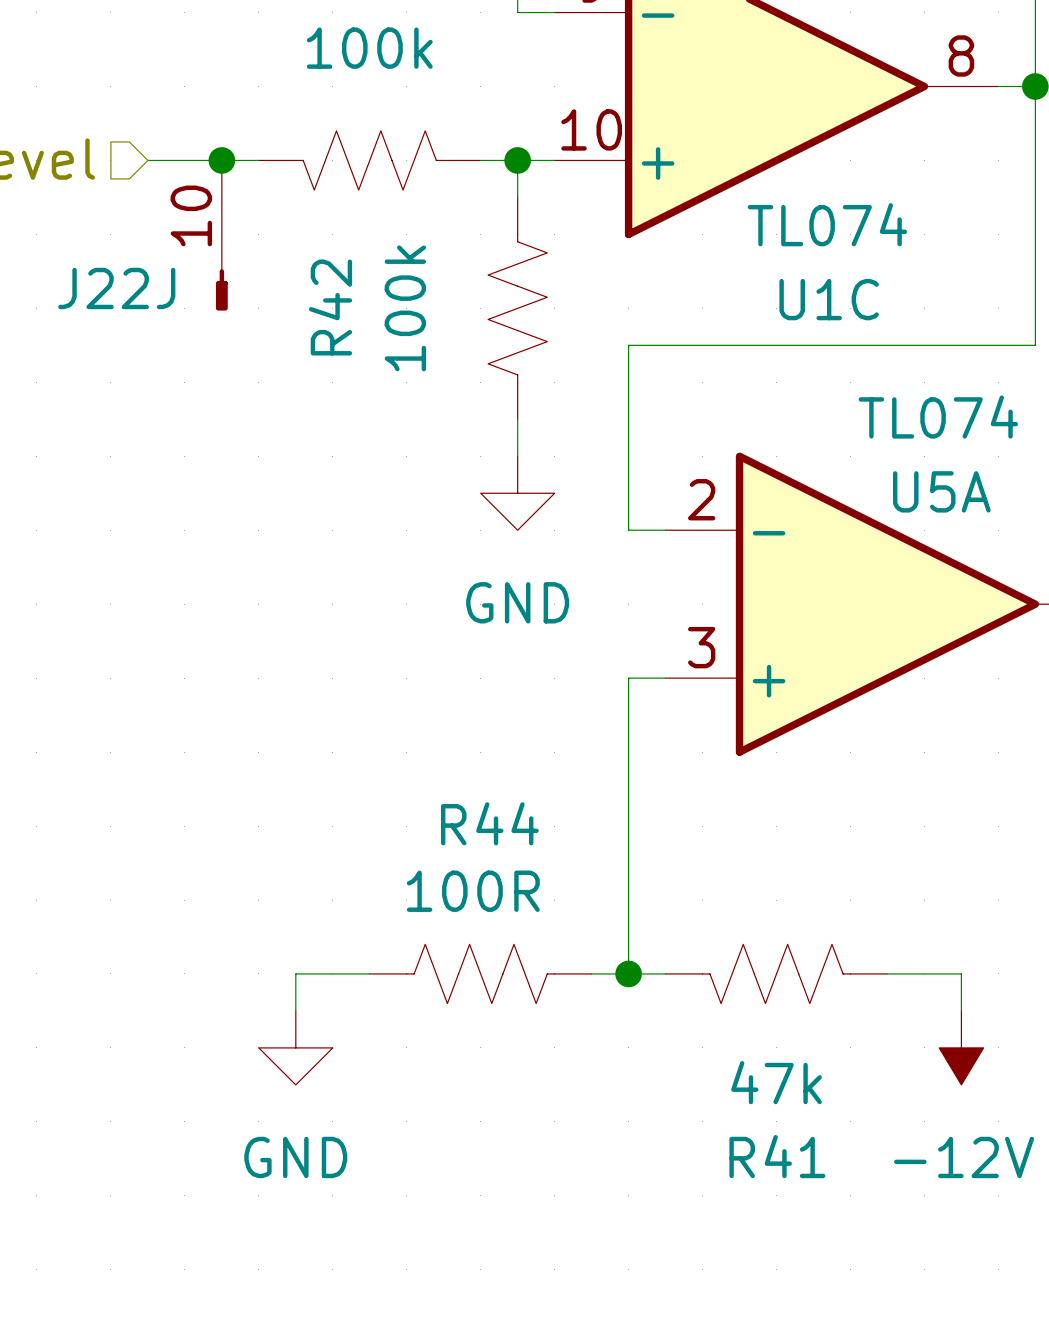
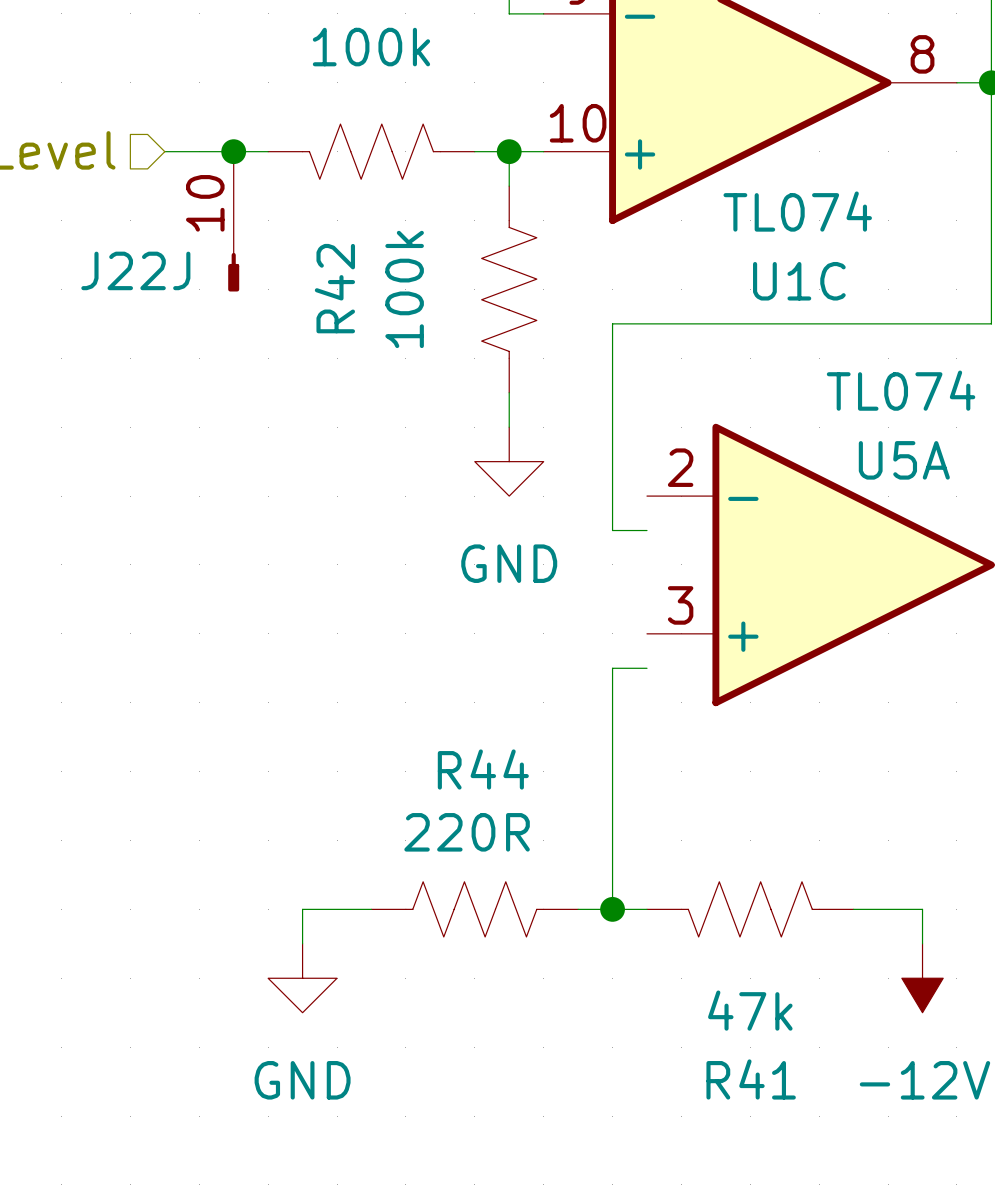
wire: (628, 530) (665, 530) -> (612, 496) (612, 530) (646, 530)
wire: (665, 678) (628, 678) (628, 715) -> (646, 668) (612, 668)
R44 value: 100R (473, 891) -> 220R (467, 832)

